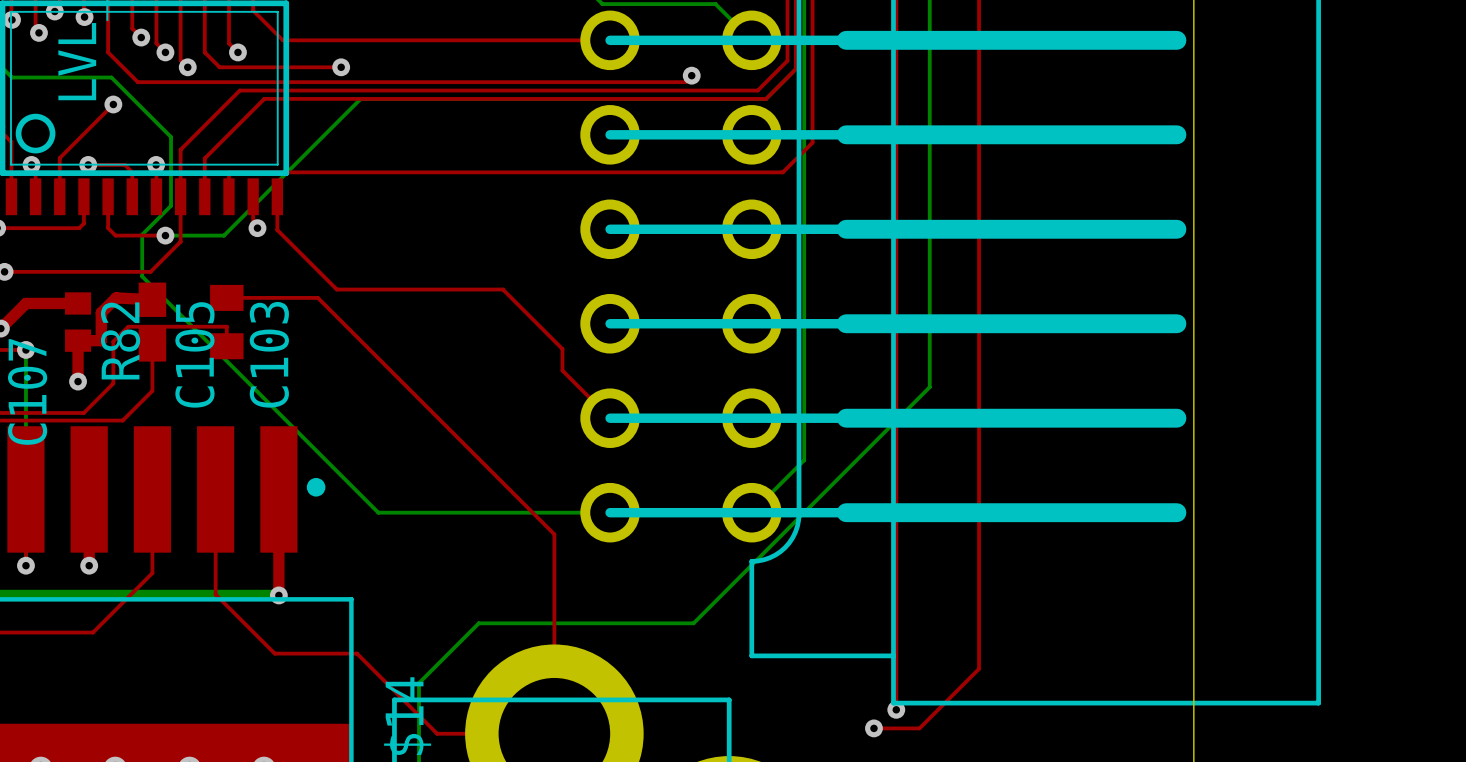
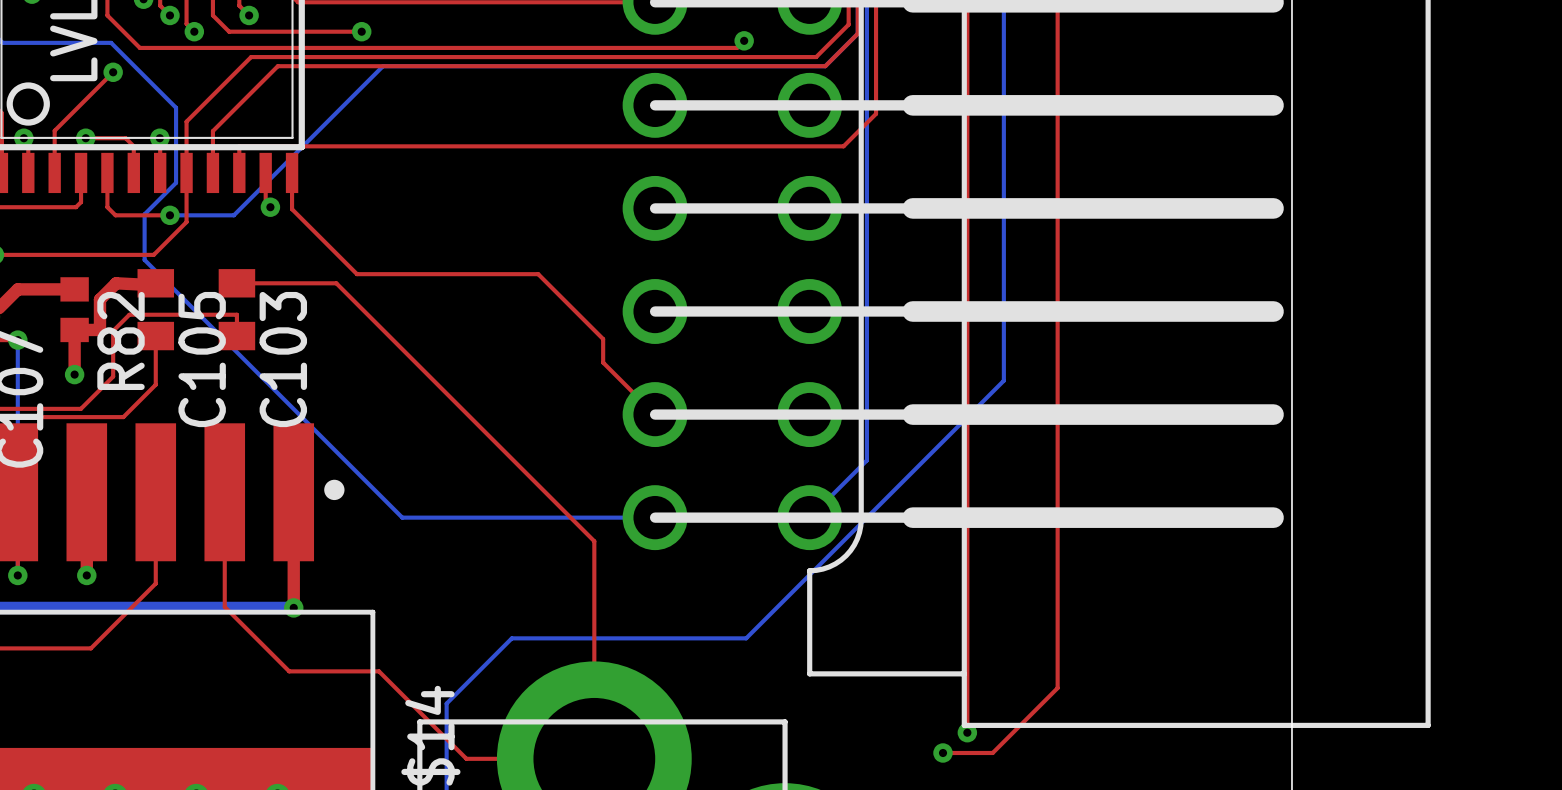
C105 footprint: [138, 282, 167, 362] -> [137, 269, 175, 351]

